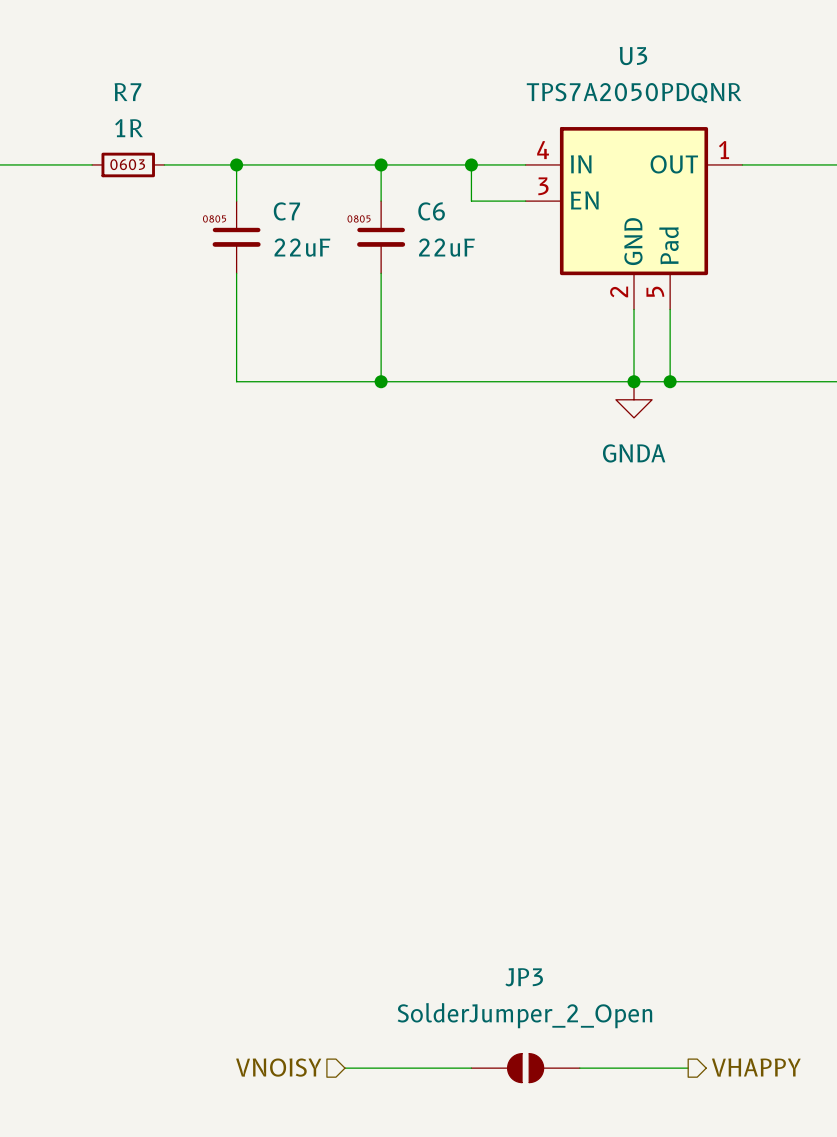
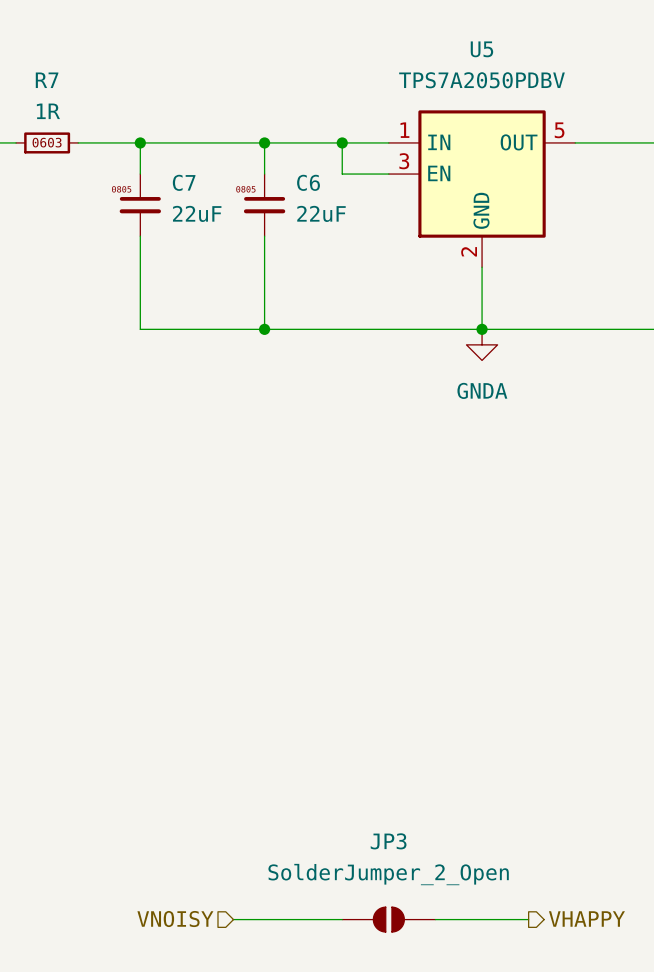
U3: TPS7A2050PDQNR (634, 218) -> none
U5: none -> TPS7A2050PDBV (482, 188)
wire: (670, 309) (670, 381) -> none
junction: (670, 381) -> none

